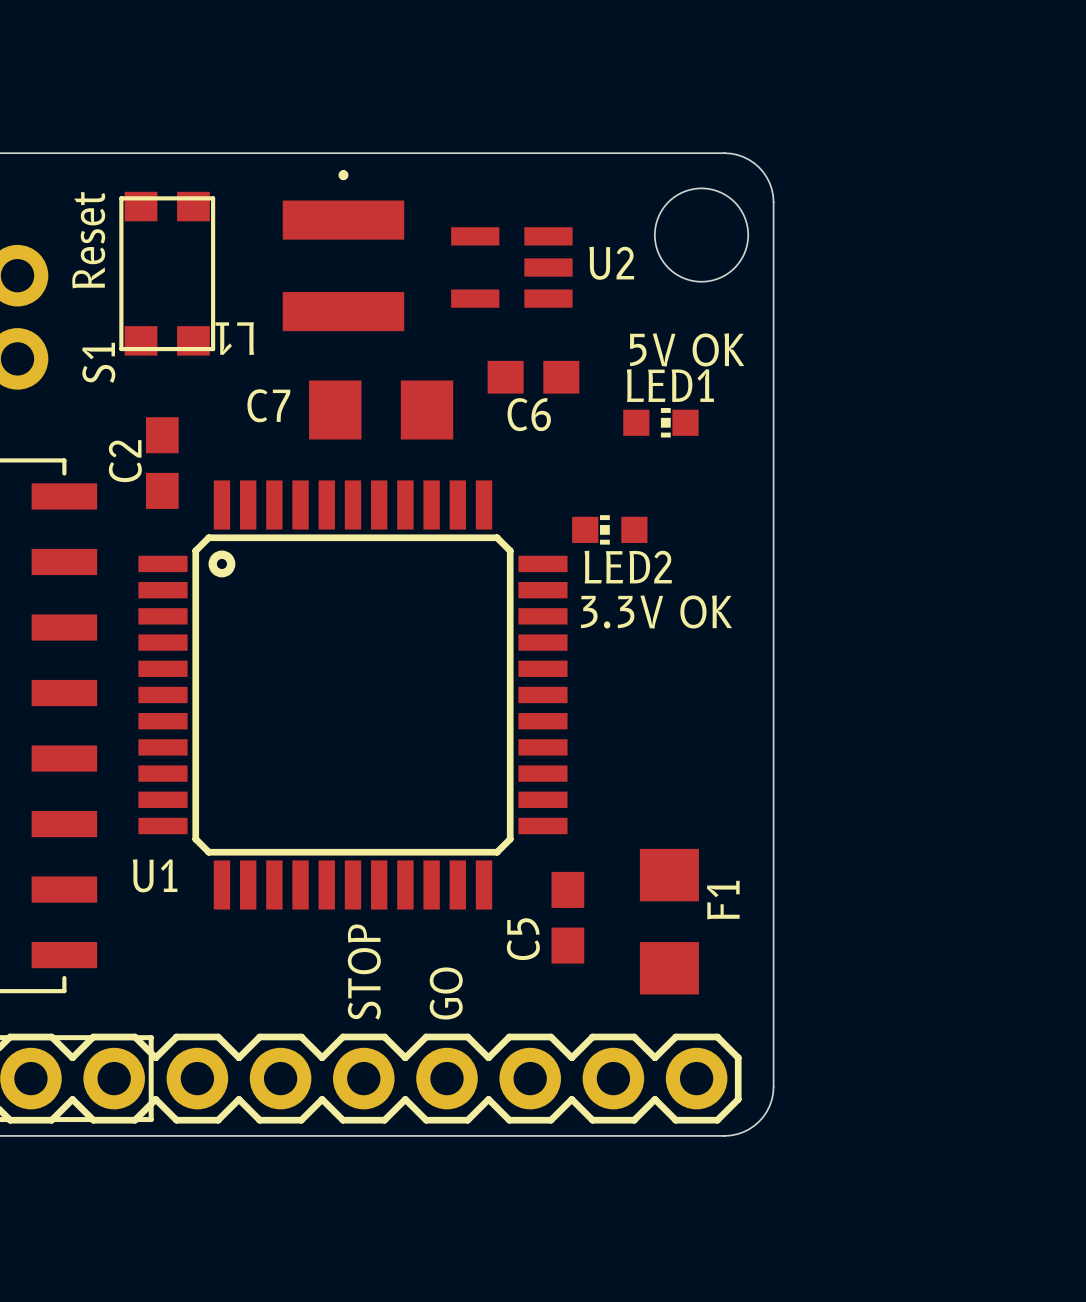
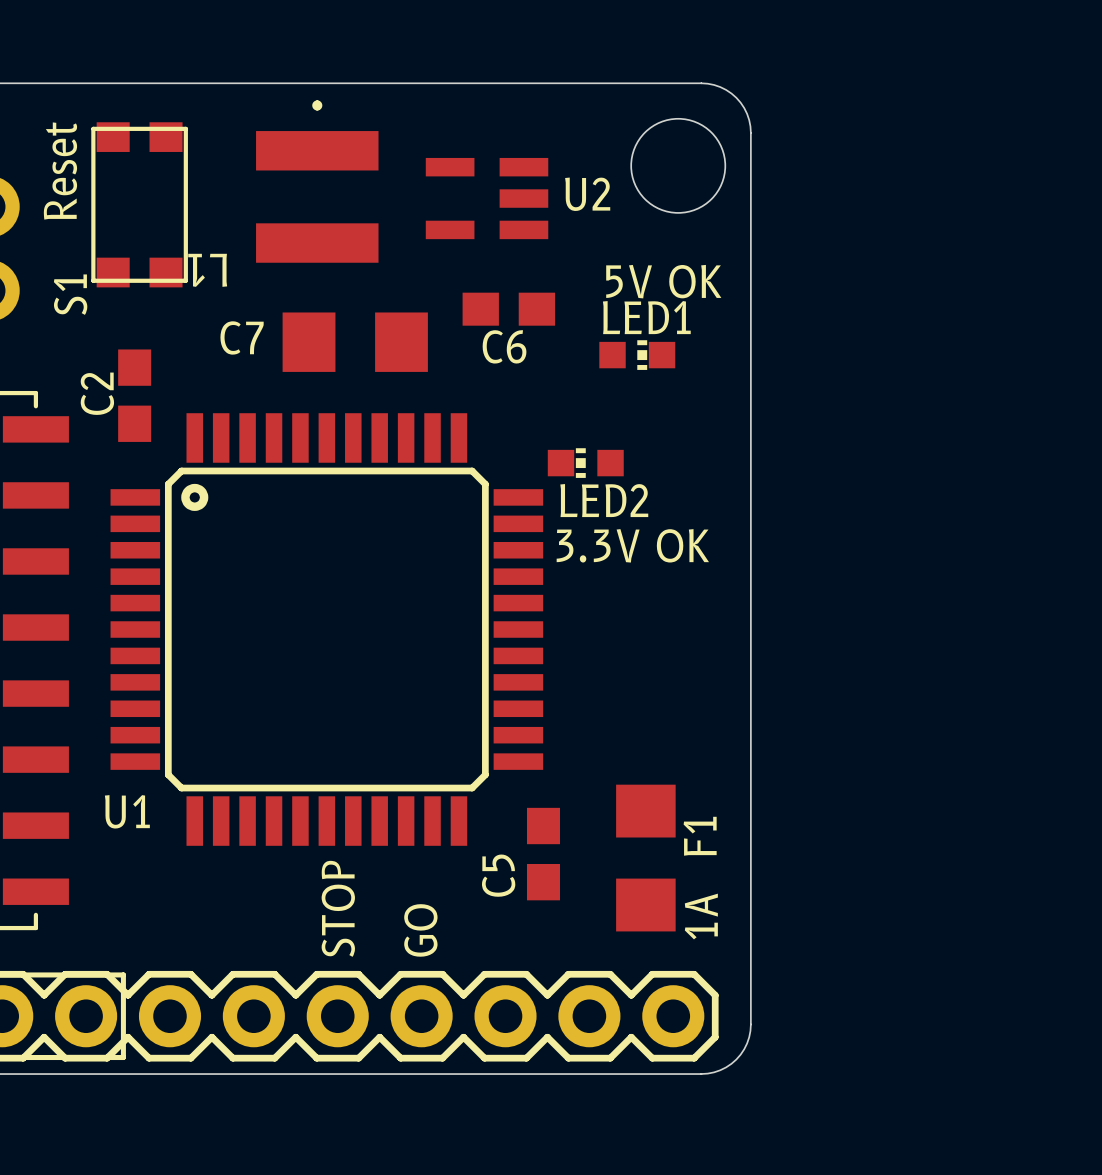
text: none -> 1A (701, 916)

